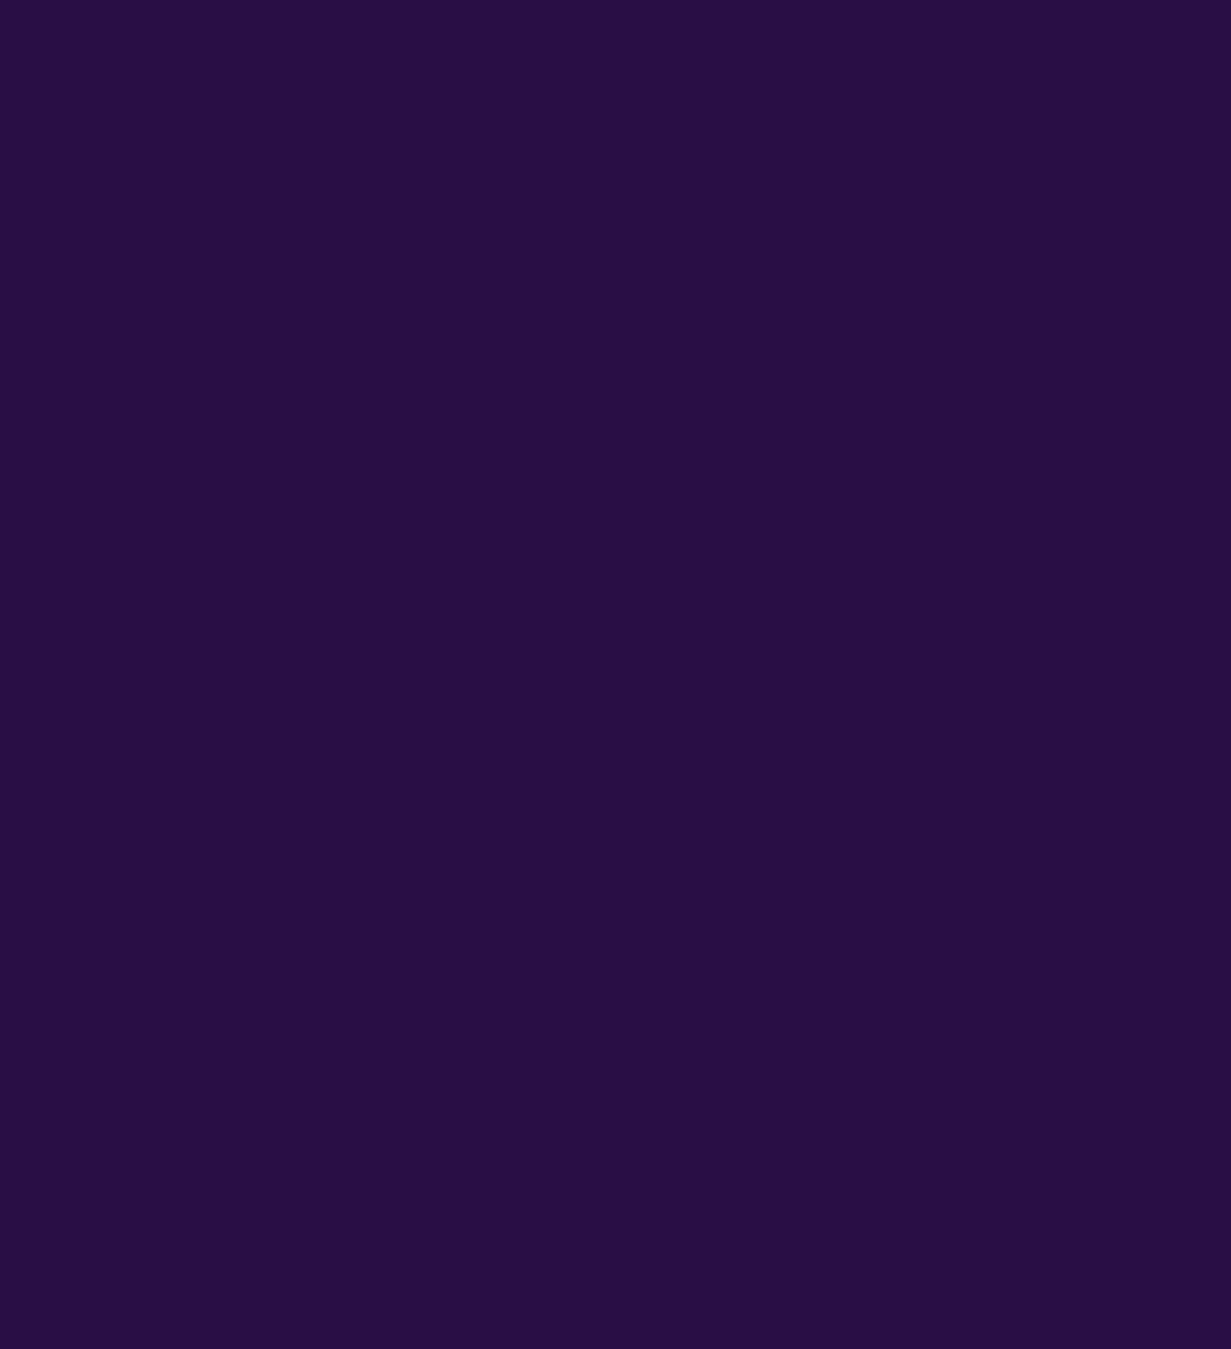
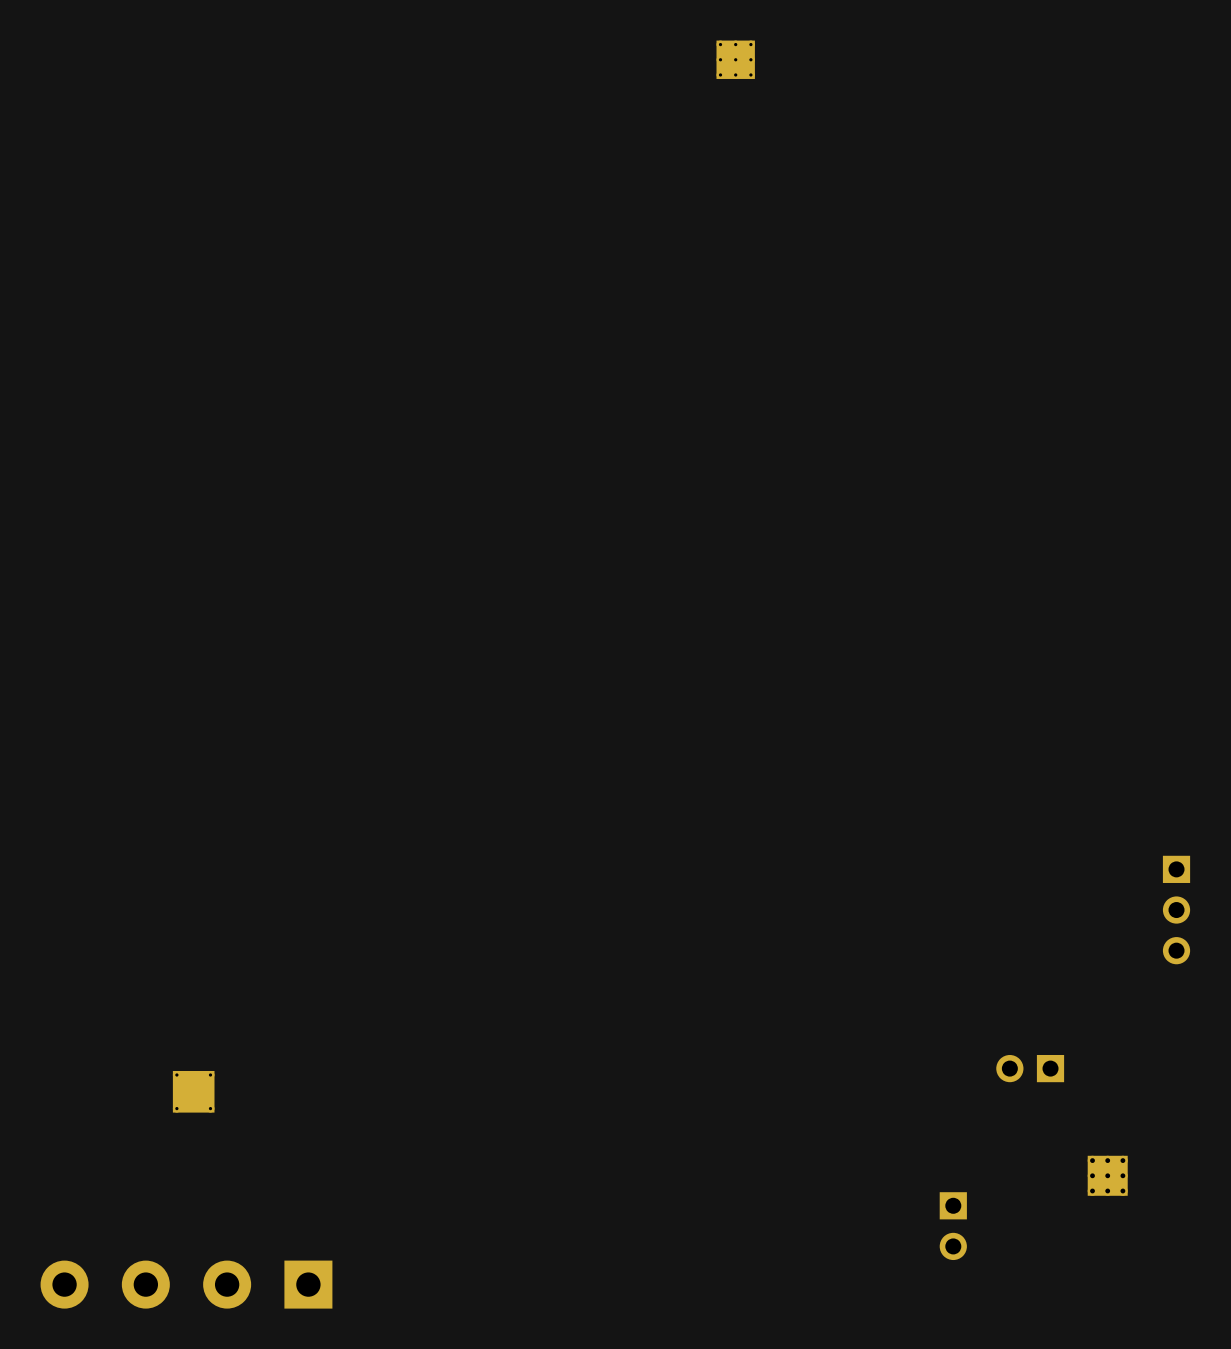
part: none -> (735, 59)
part: none -> (1176, 910)
part: none -> (1030, 1068)
part: none -> (193, 1091)
part: none -> (1107, 1175)
part: none -> (953, 1226)
part: none -> (186, 1284)

